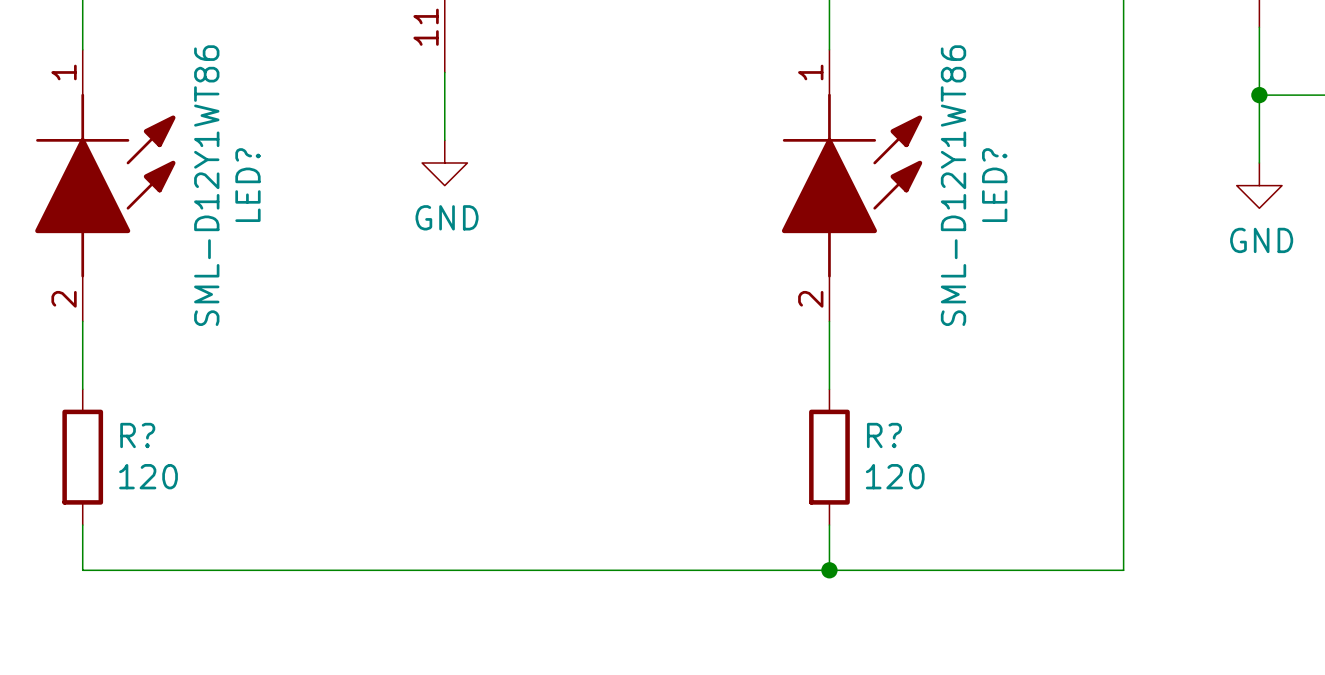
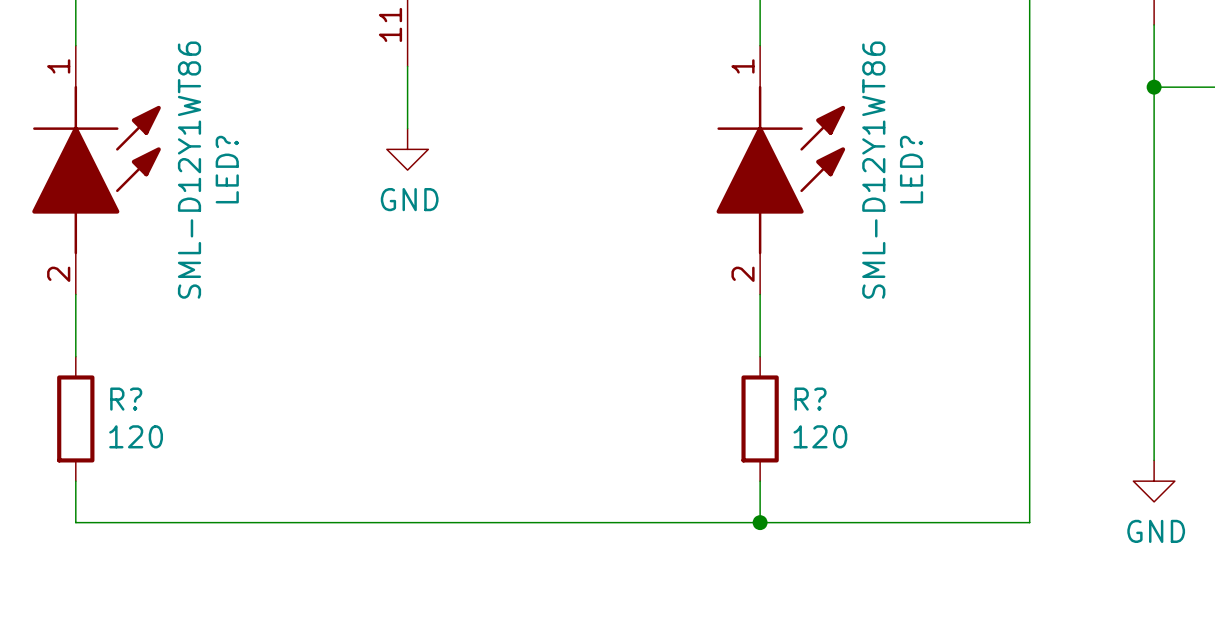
wire: none -> (1154, 149) (1154, 460)
power symbol position: GND (1259, 185) -> GND (1154, 481)

